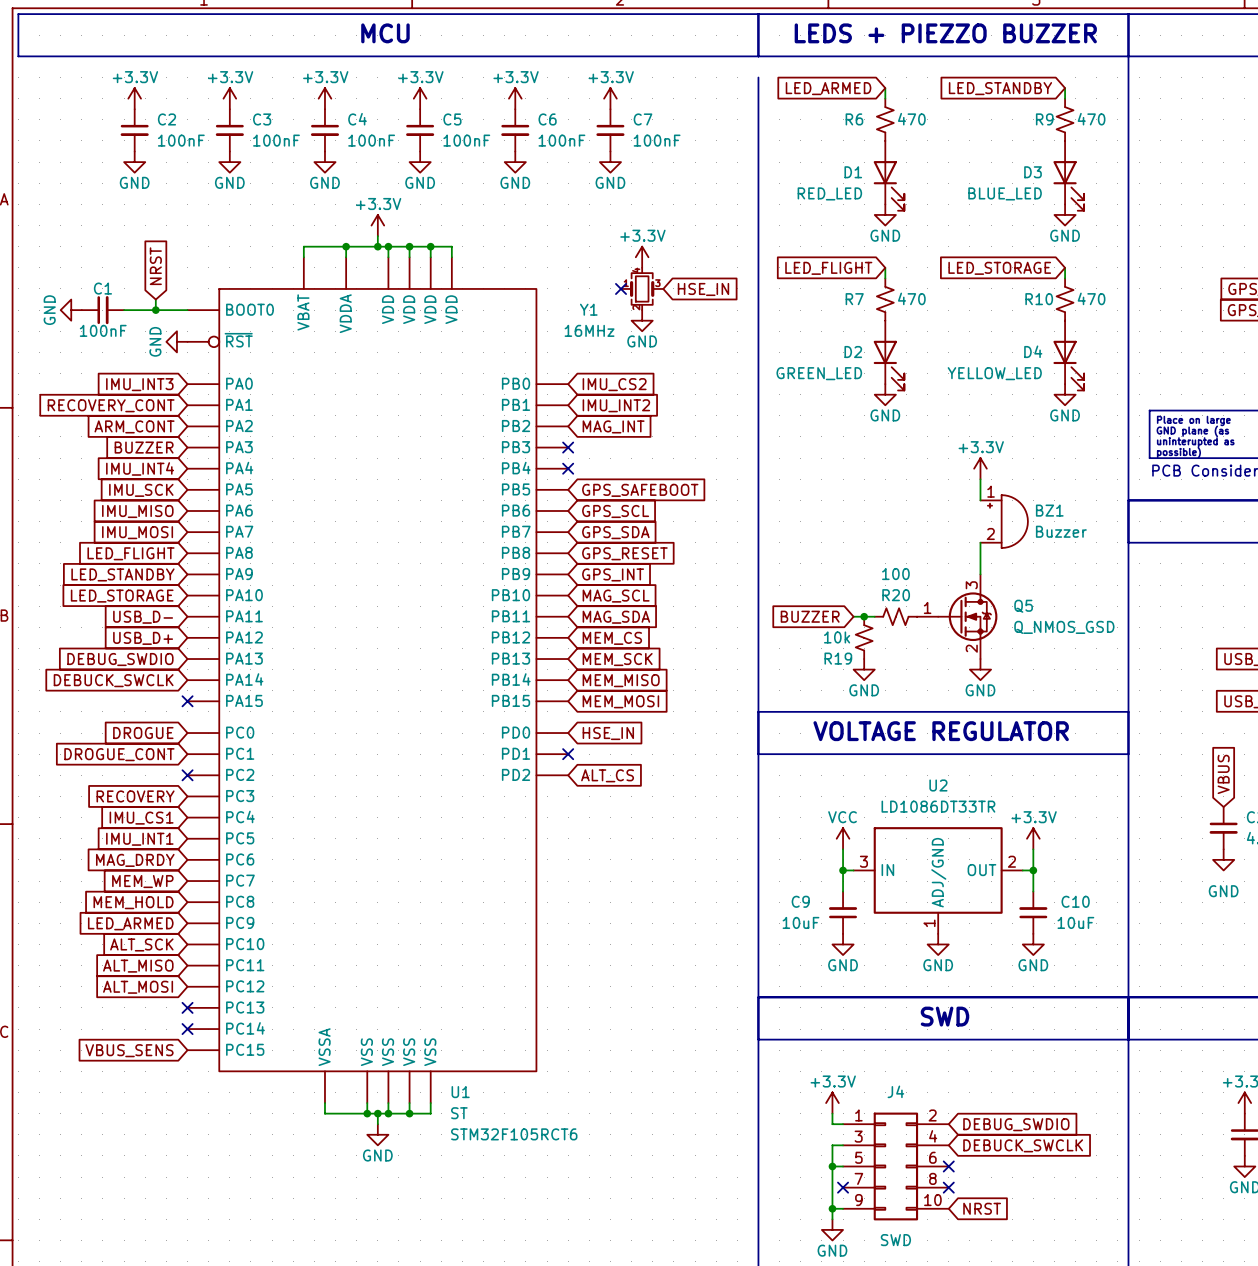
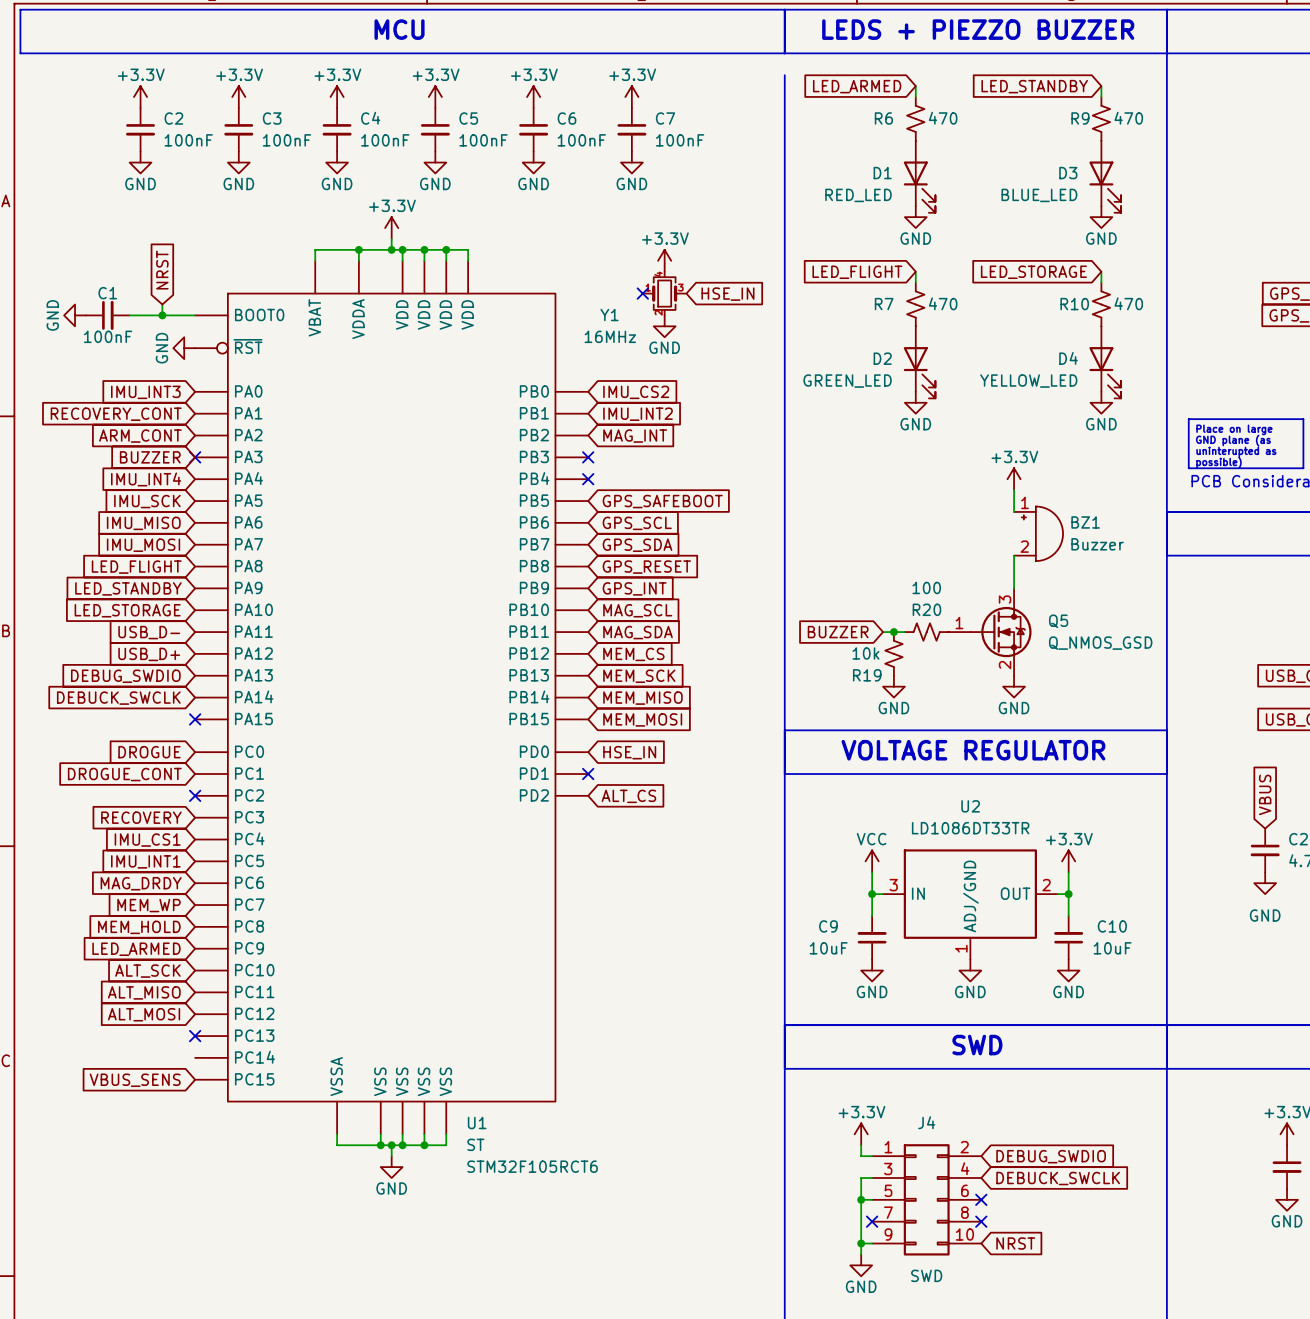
no-connect mark: none -> (195, 457)
no-connect mark: (187, 1029) -> none

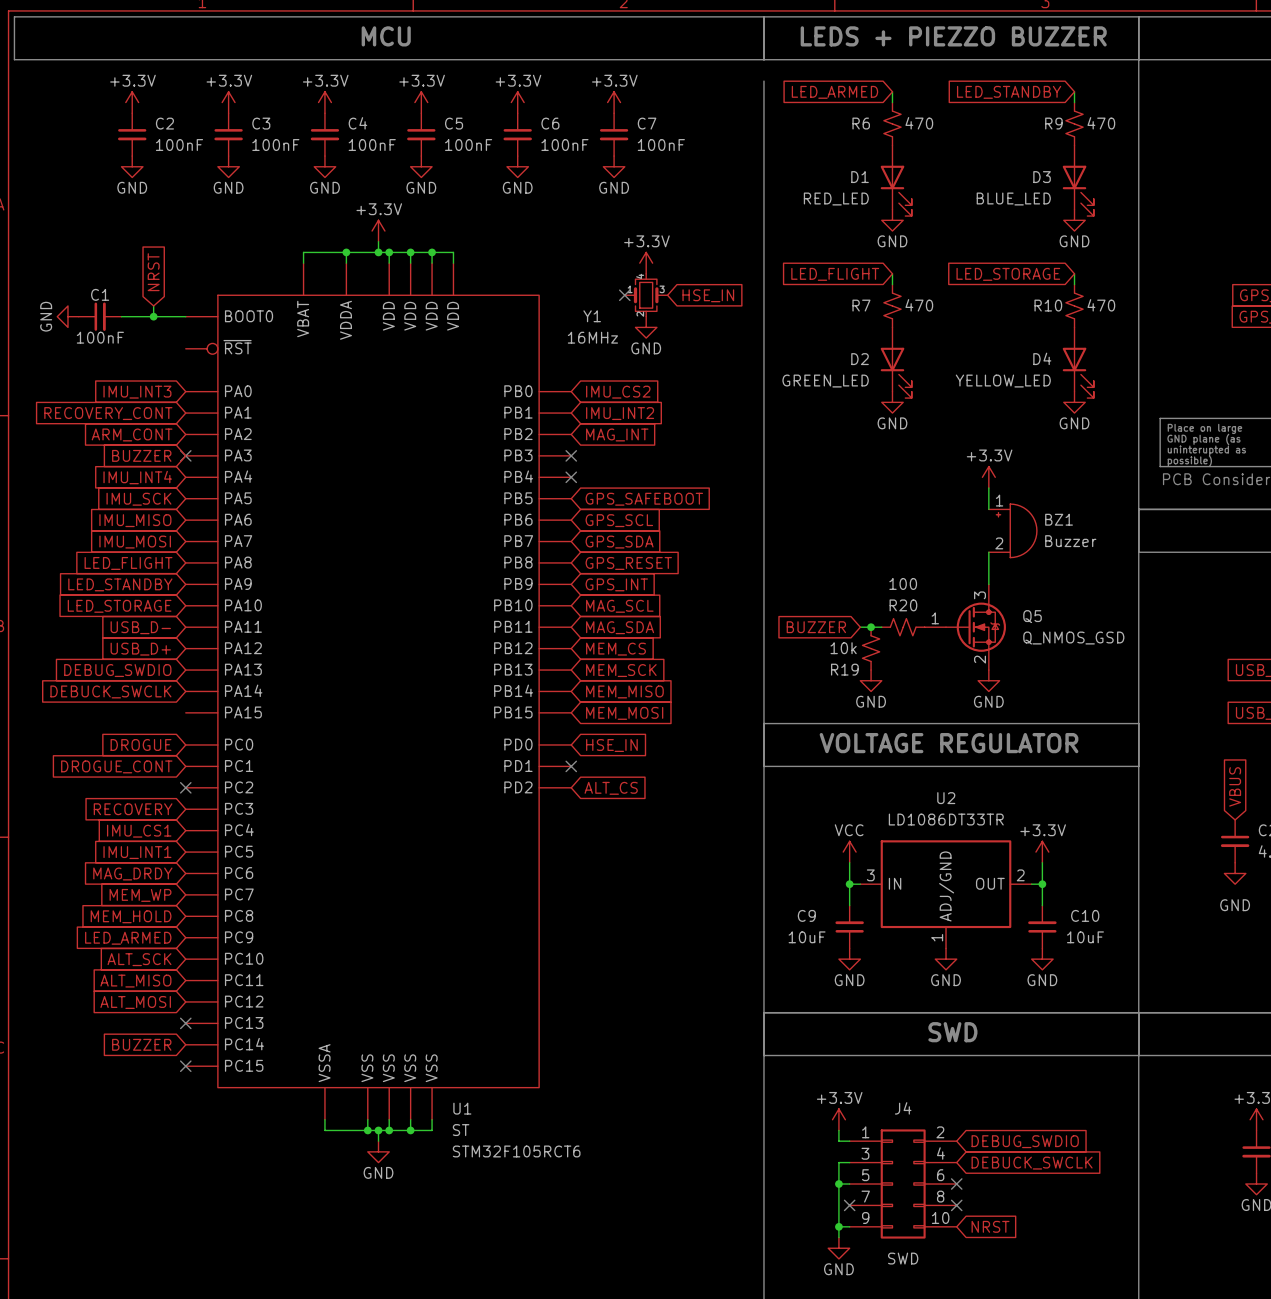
power symbol: GND (184, 348) -> none
no-connect mark: (195, 719) -> none
global label: none -> BUZZER (141, 1044)
no-connect mark: none -> (185, 1066)
global label: VBUS_SENS (135, 1080) -> none

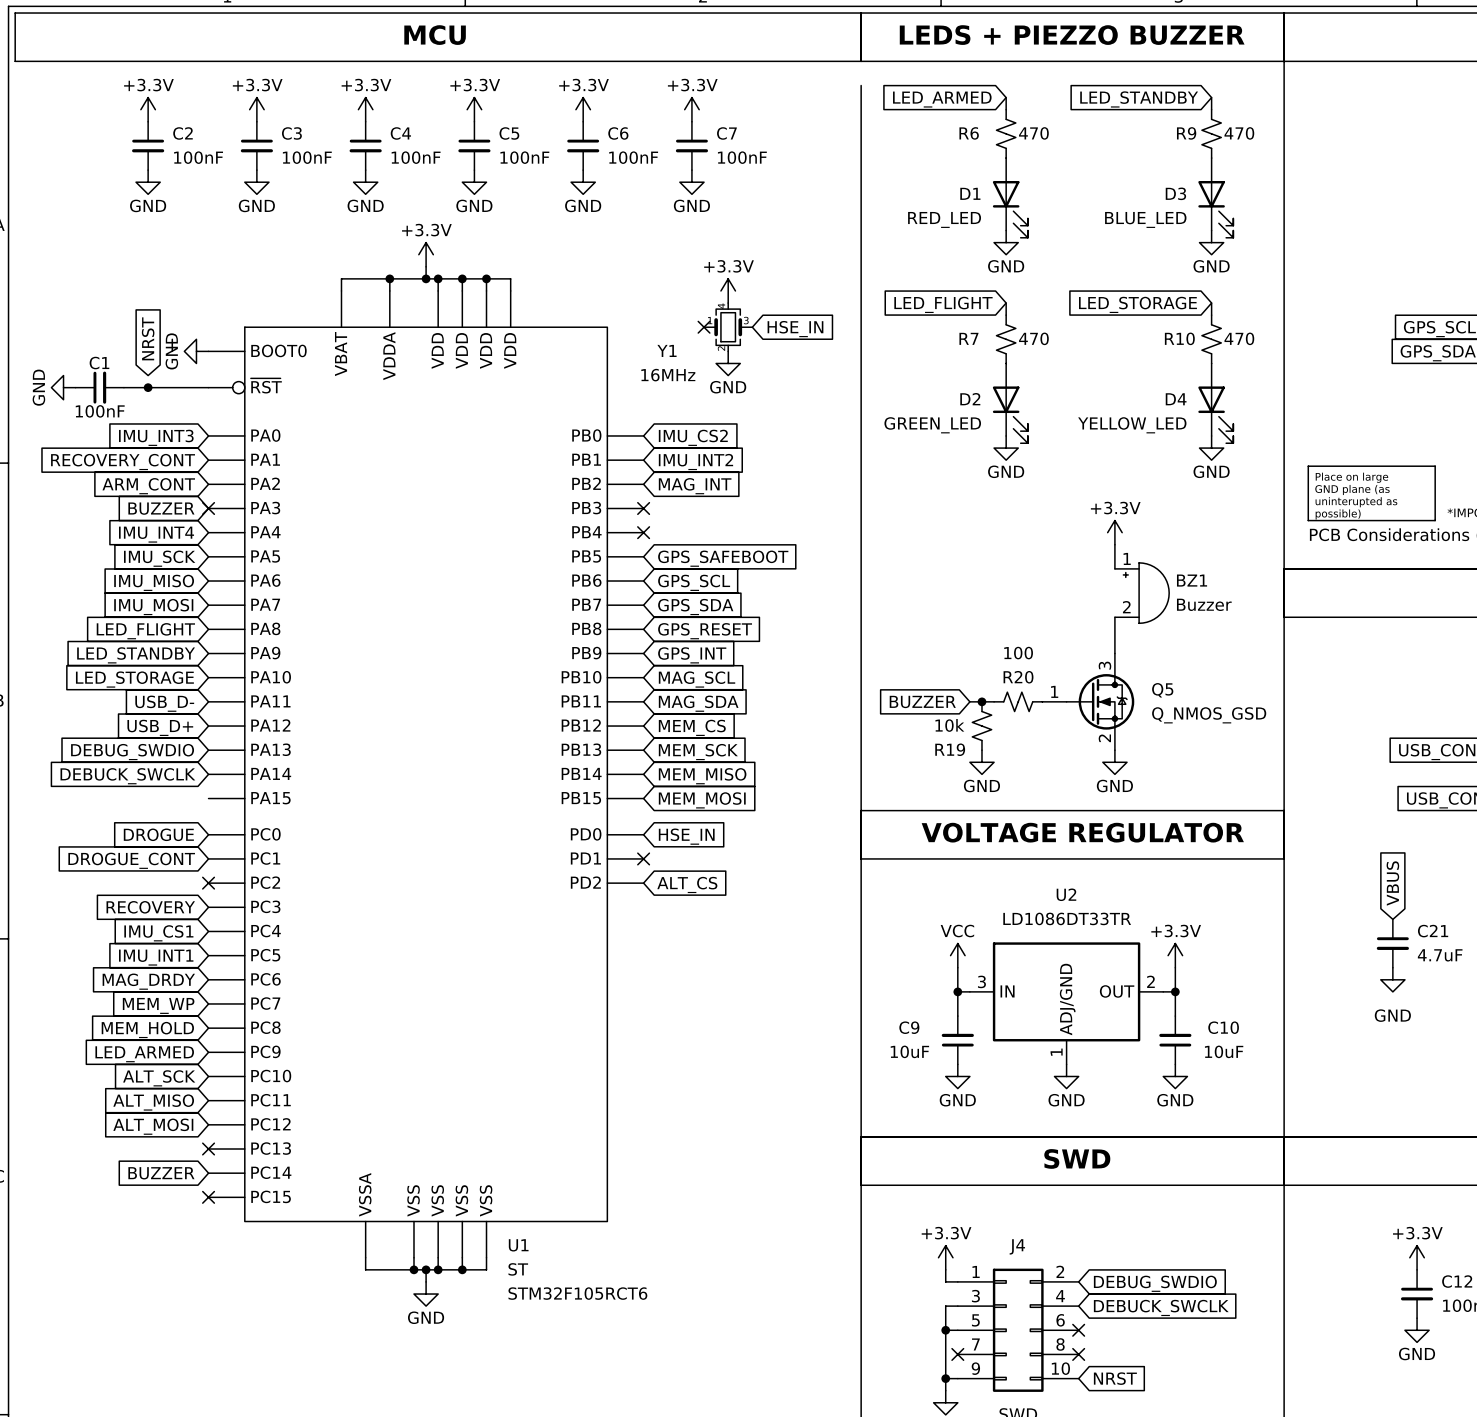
global label position: NRST (153, 272) -> NRST (148, 338)
power symbol position: GND (67, 316) -> GND (63, 387)
C1 position: (100, 316) -> (99, 387)
wire: (121, 316) (185, 316) -> none
junction position: (153, 316) -> (148, 387)
power symbol: none -> GND (196, 351)
wire: none -> (123, 387) (208, 387)

